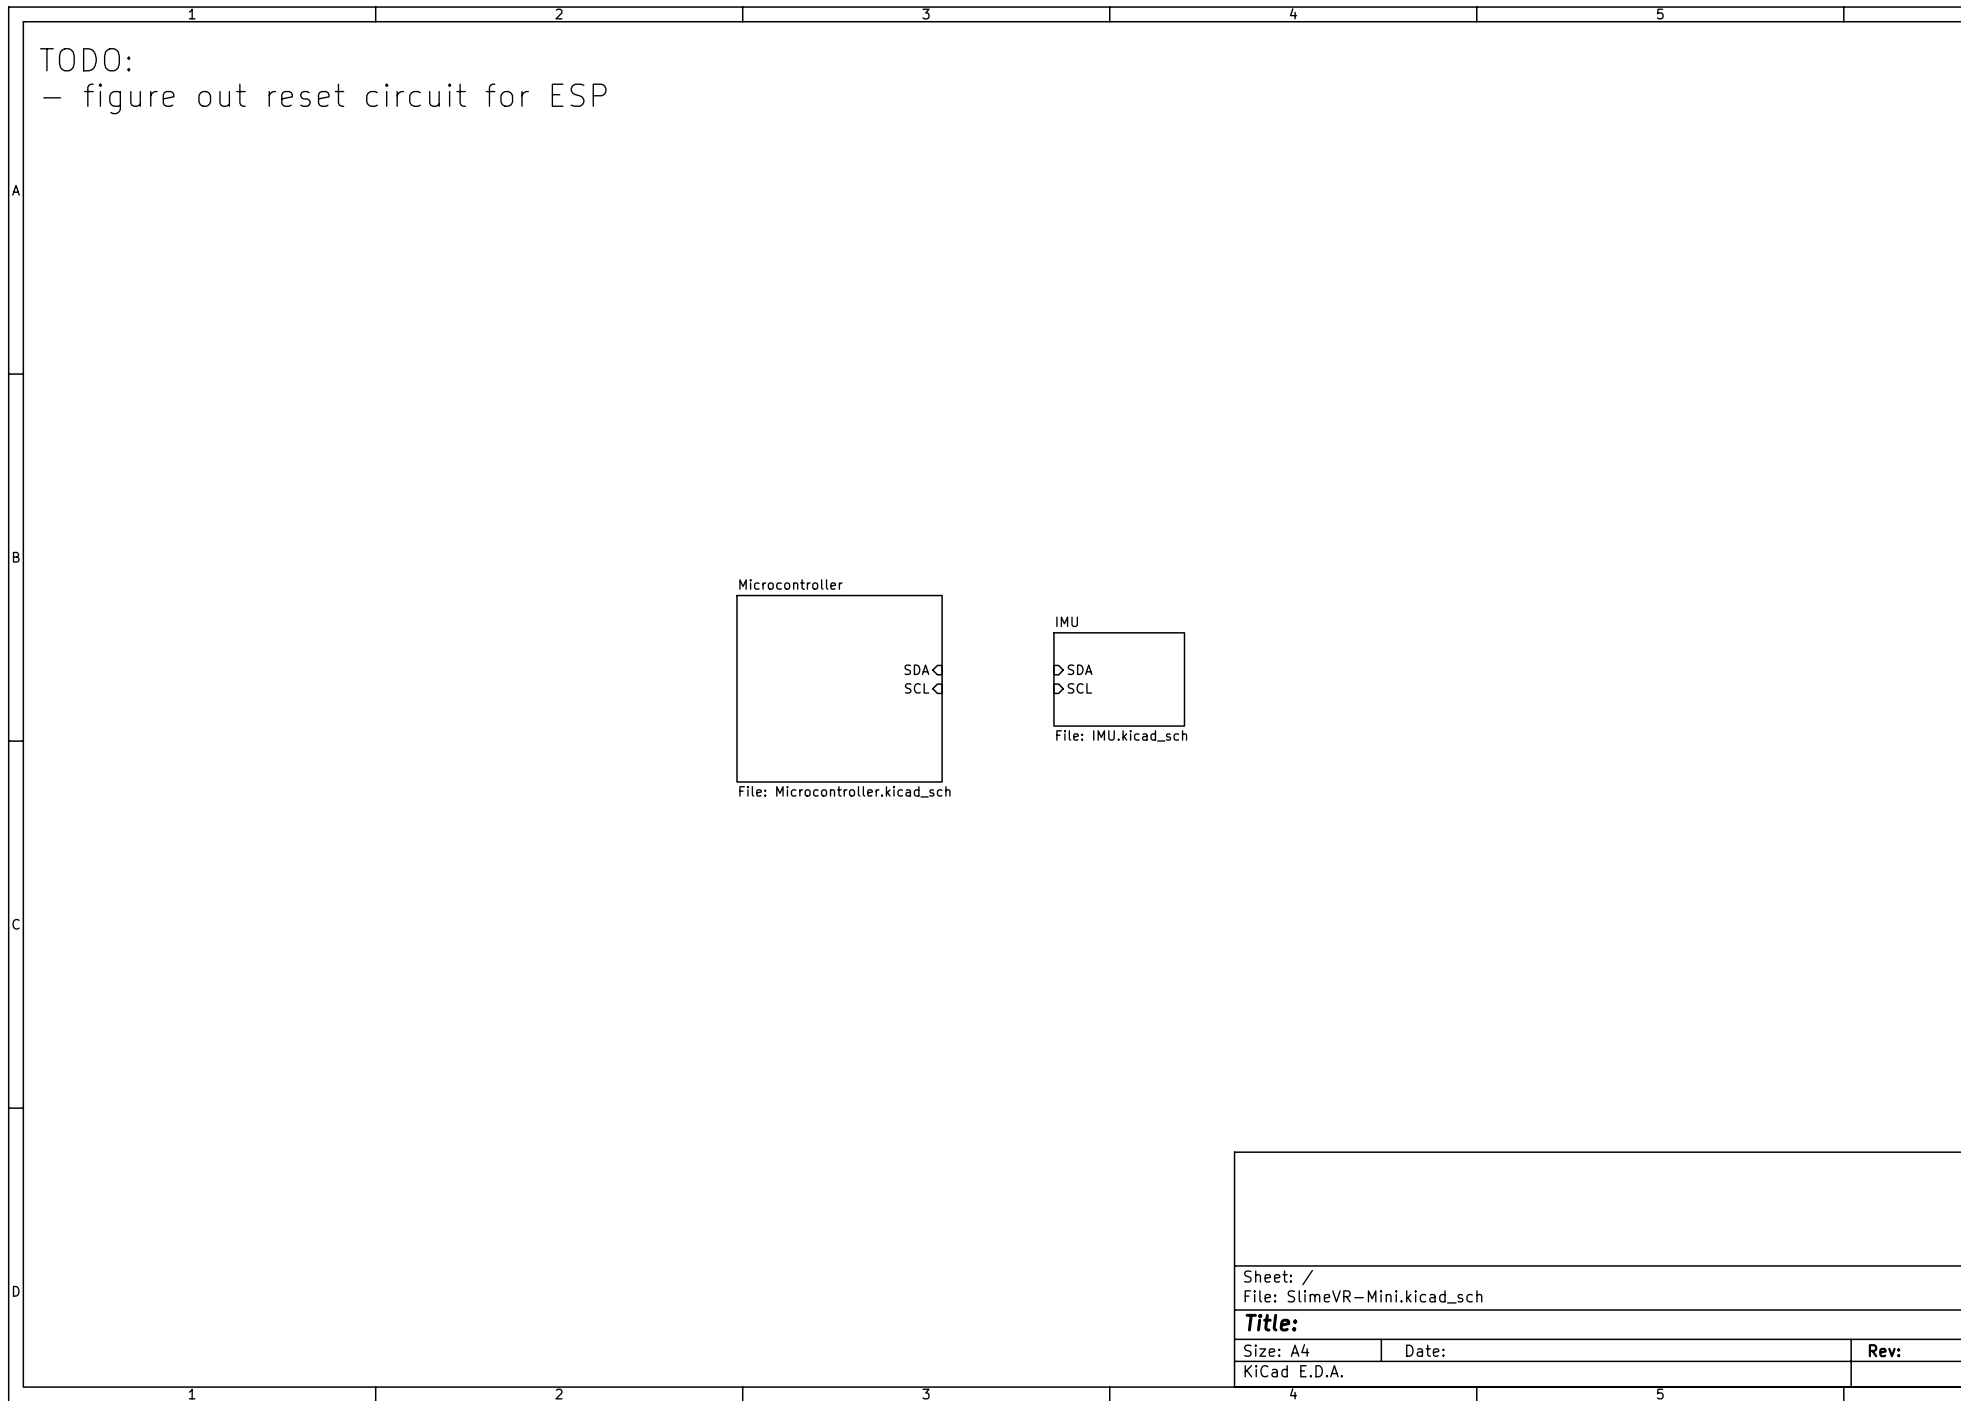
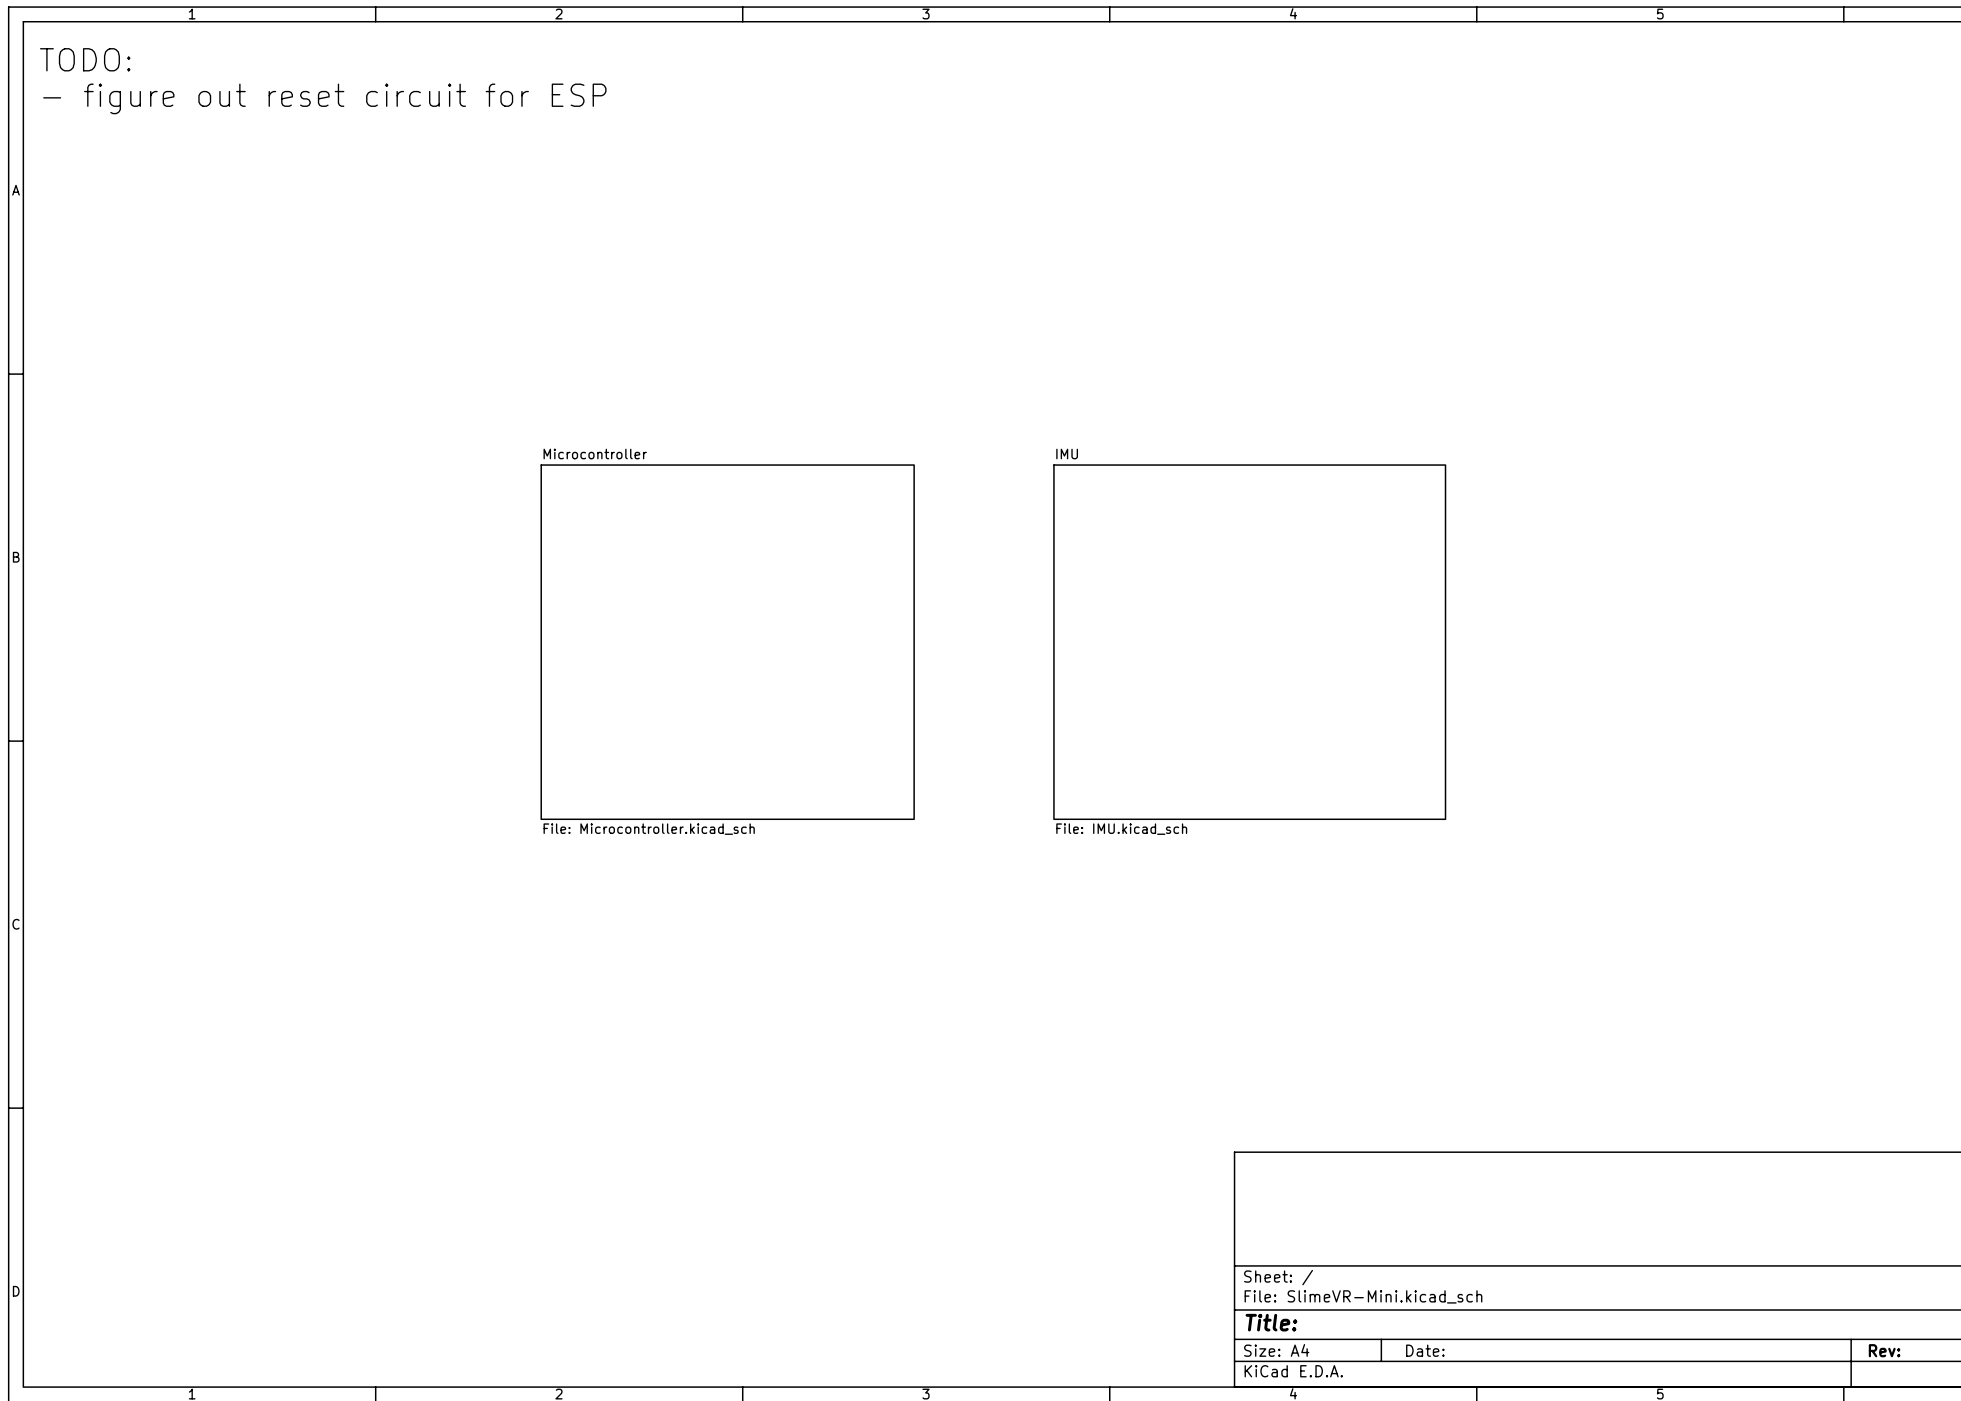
sheet Microcontroller: none -> File: Microcontroller.kicad_sch (727, 642)
sheet IMU: none -> File: IMU.kicad_sch (1249, 642)
sheet pin: SDA (916, 669) -> none
sheet pin: SDA (1080, 669) -> none
sheet IMU: File: IMU.kicad_sch (1119, 679) -> none
sheet Microcontroller: File: Microcontroller.kicad_sch (839, 688) -> none
sheet pin: SCL (917, 688) -> none
sheet pin: SCL (1079, 688) -> none

